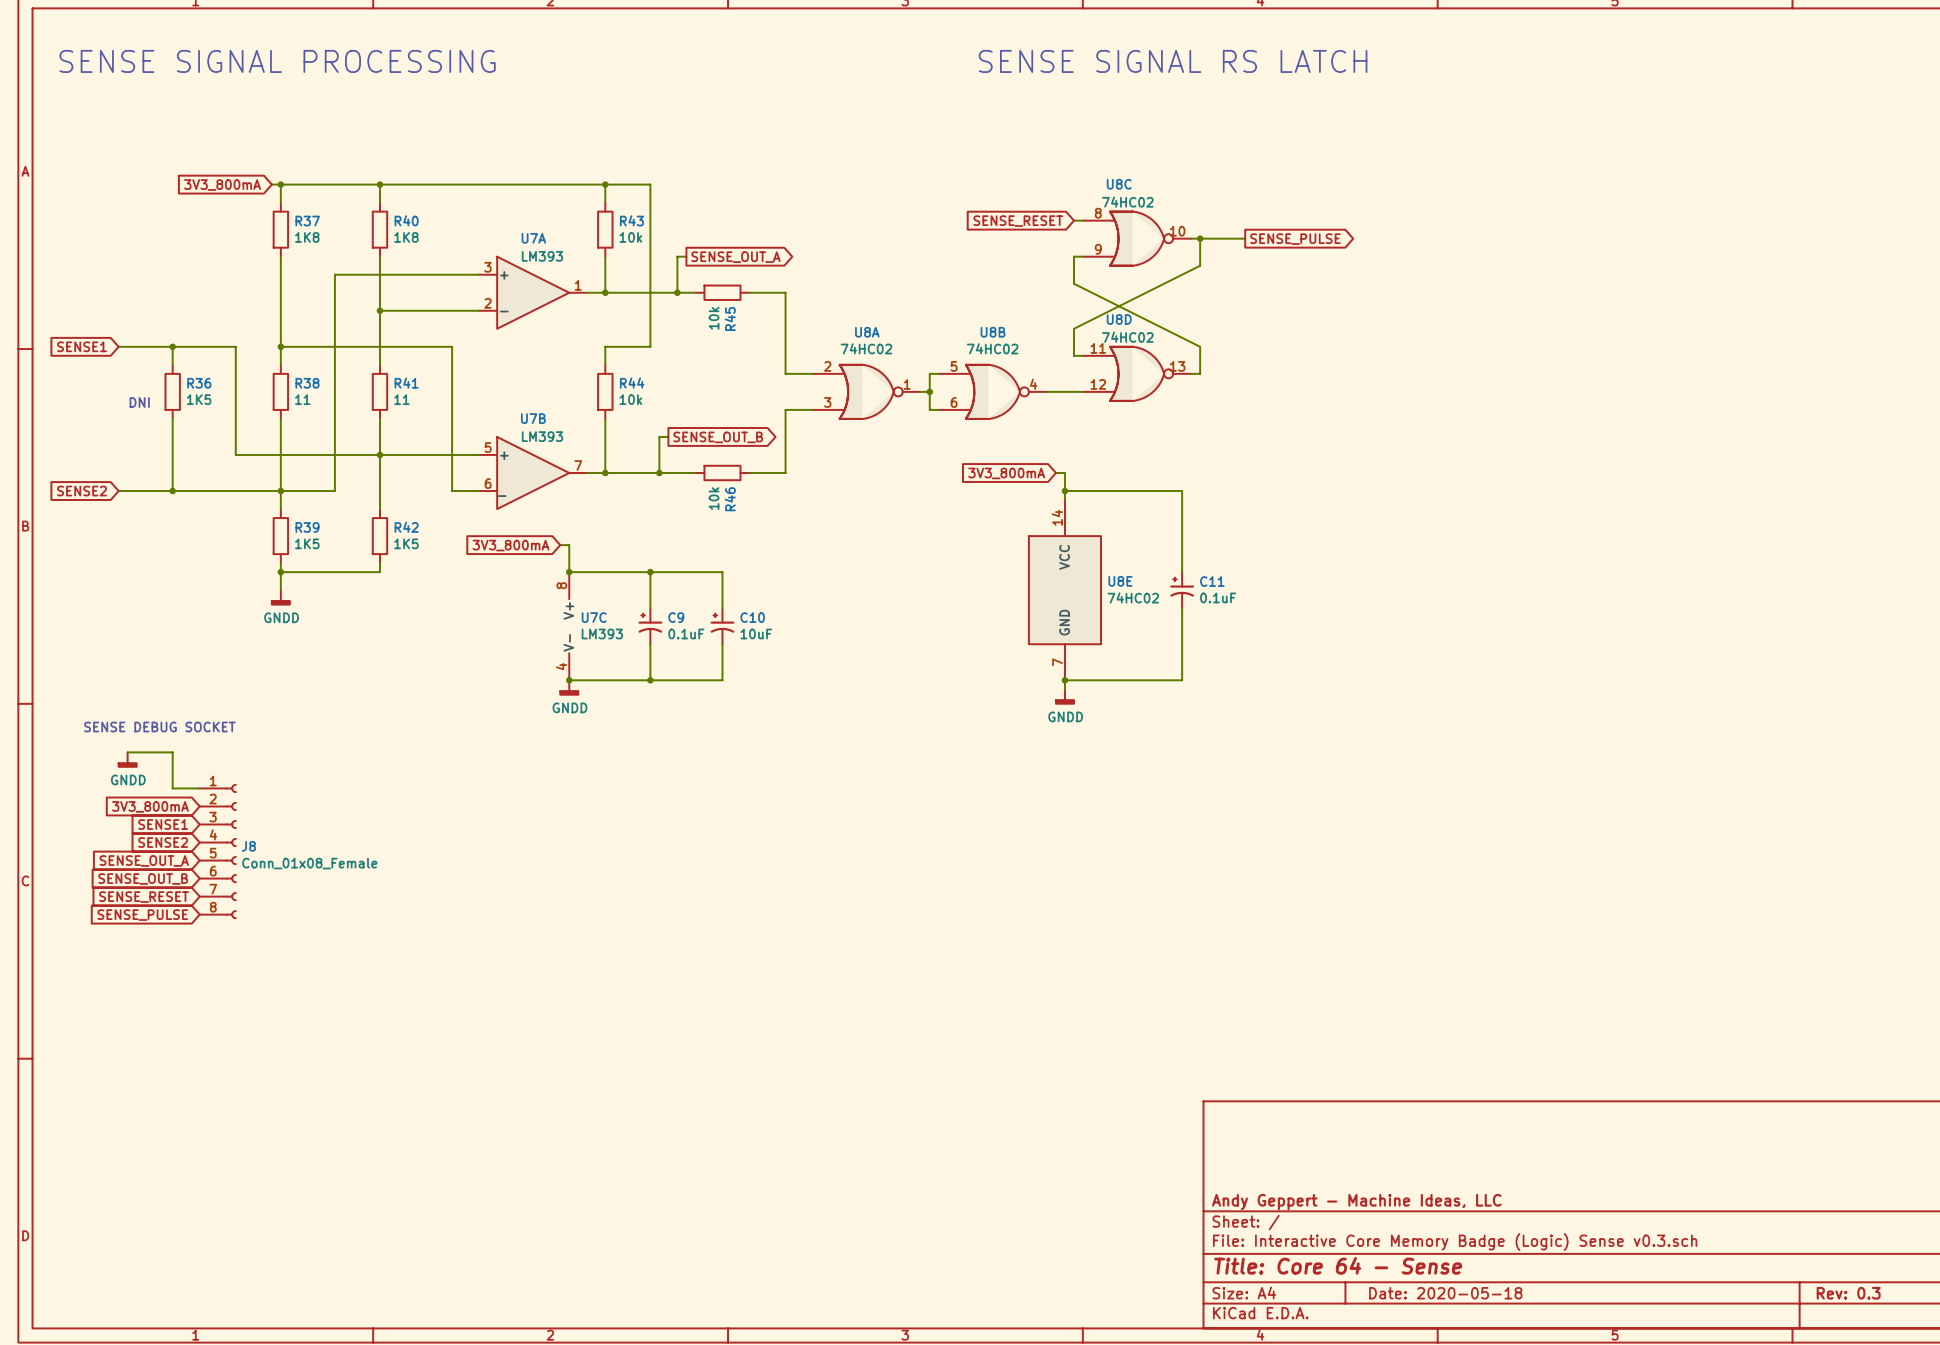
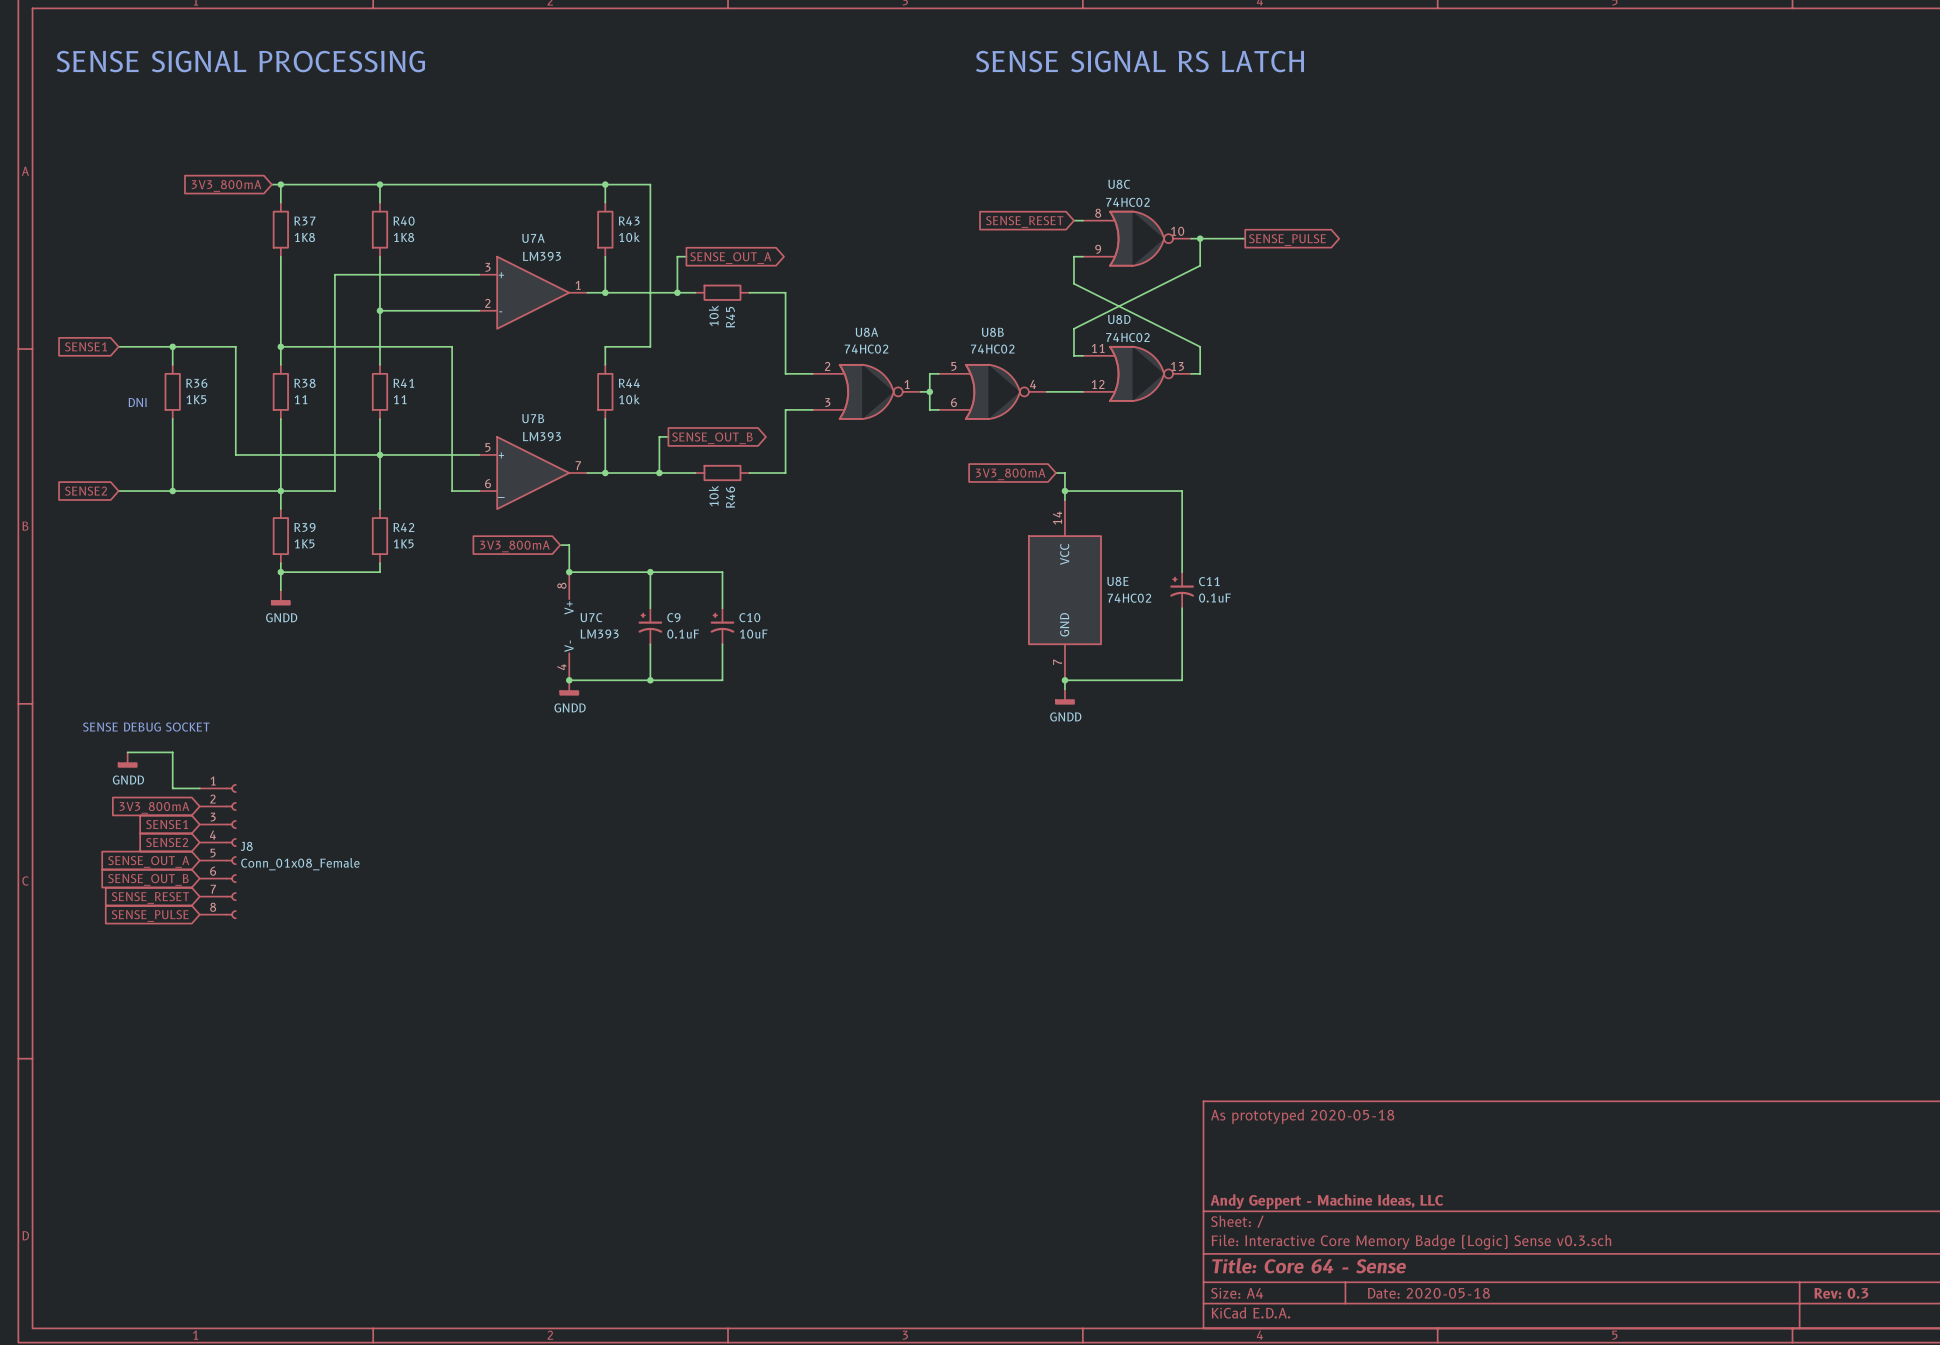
title block: none -> As prototyped 2020-05-18 (1302, 1116)

